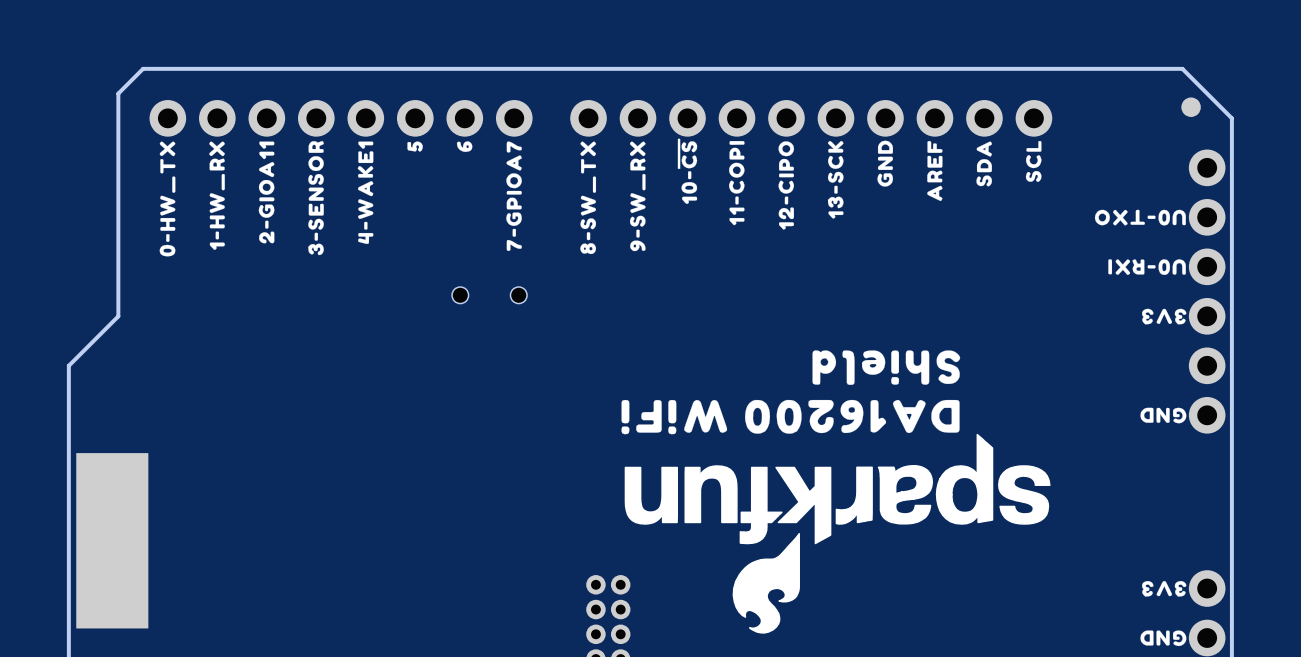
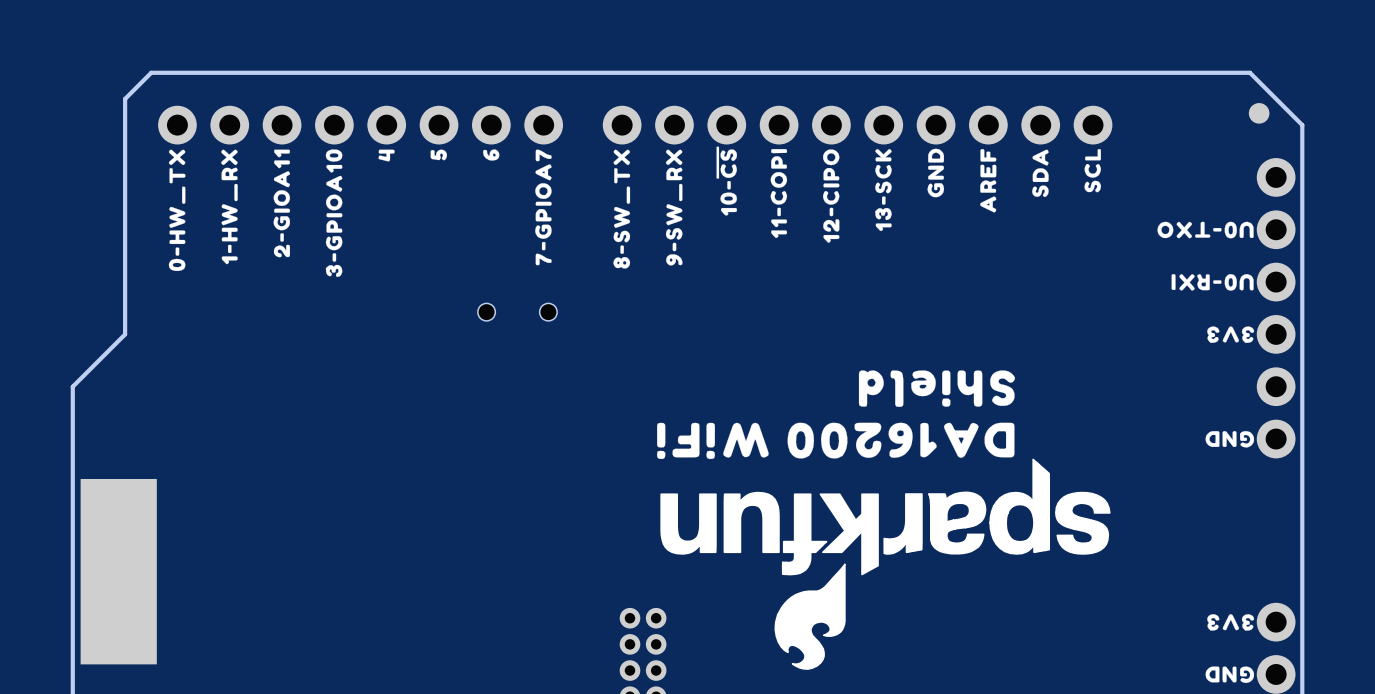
drawing shape: [308, 141, 324, 256] -> [325, 149, 343, 277]
drawing: [357, 141, 374, 244] -> none
drawing: none -> [378, 149, 395, 162]

